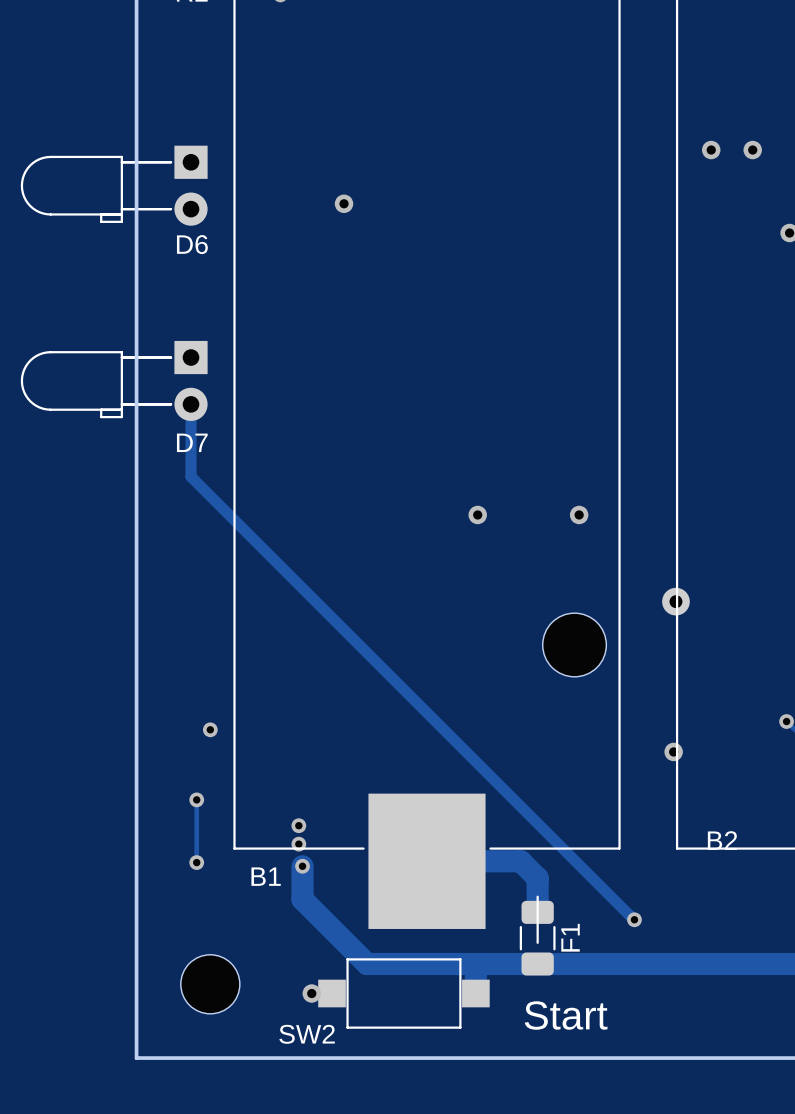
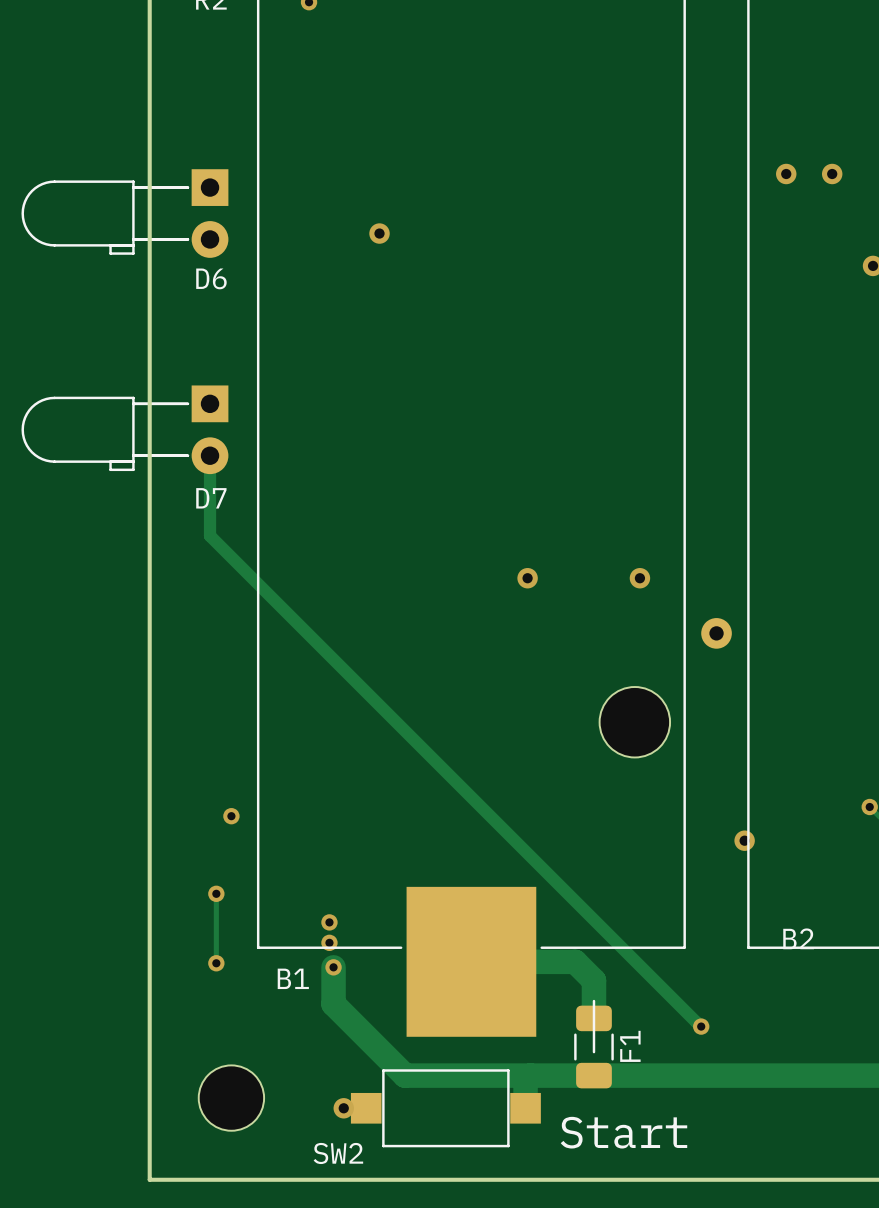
part position: (675, 601) -> (716, 633)

